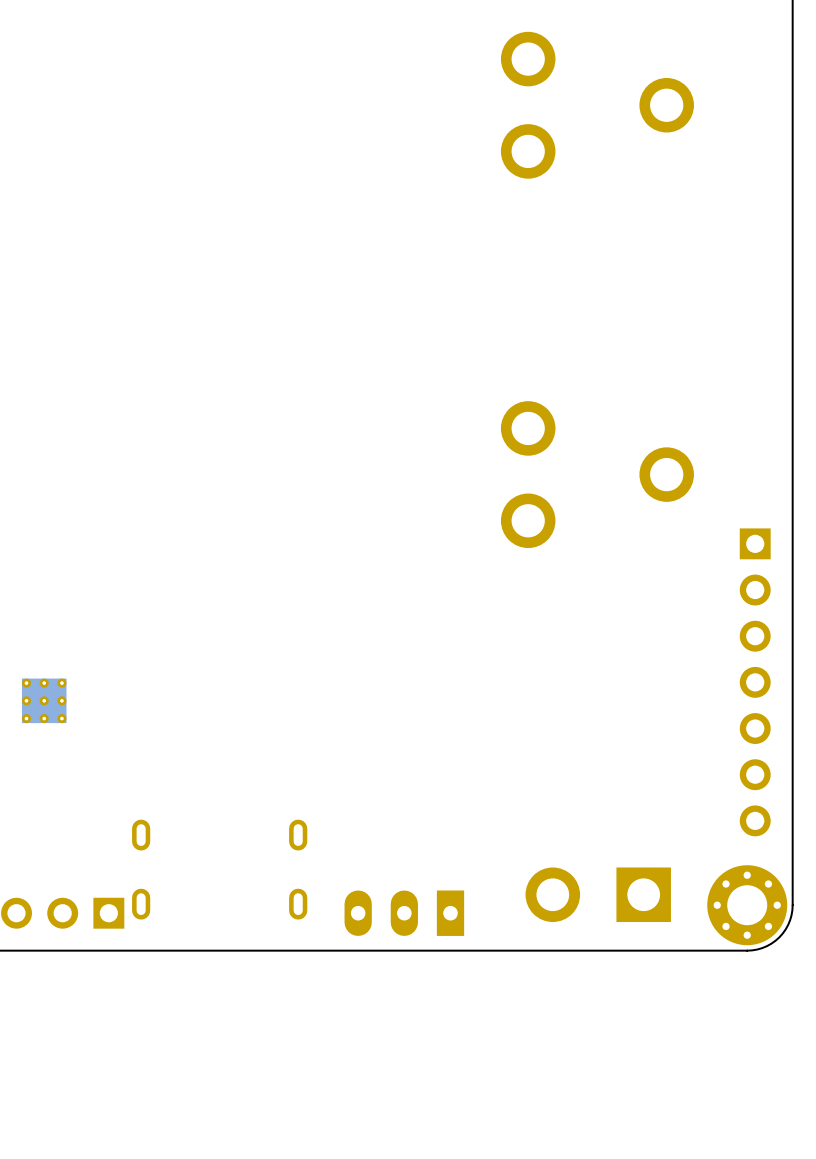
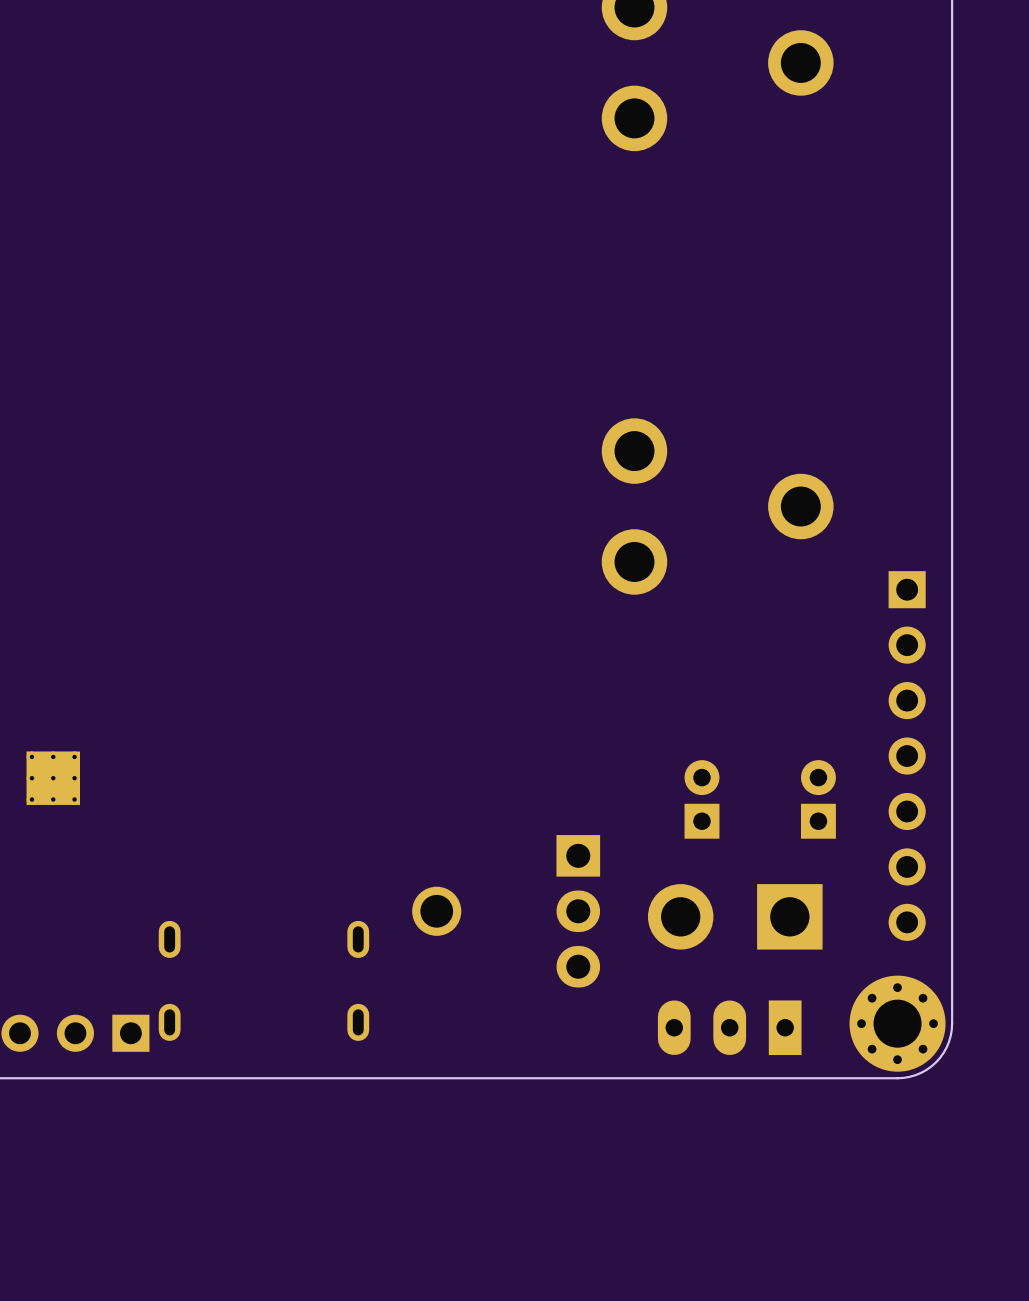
part: none -> (702, 799)
part: none -> (818, 799)
part: none -> (436, 911)
part: none -> (578, 911)
part: none -> (735, 916)
part footprint: [525, 867, 671, 923] -> [657, 1000, 802, 1056]
part: (404, 913) -> none

